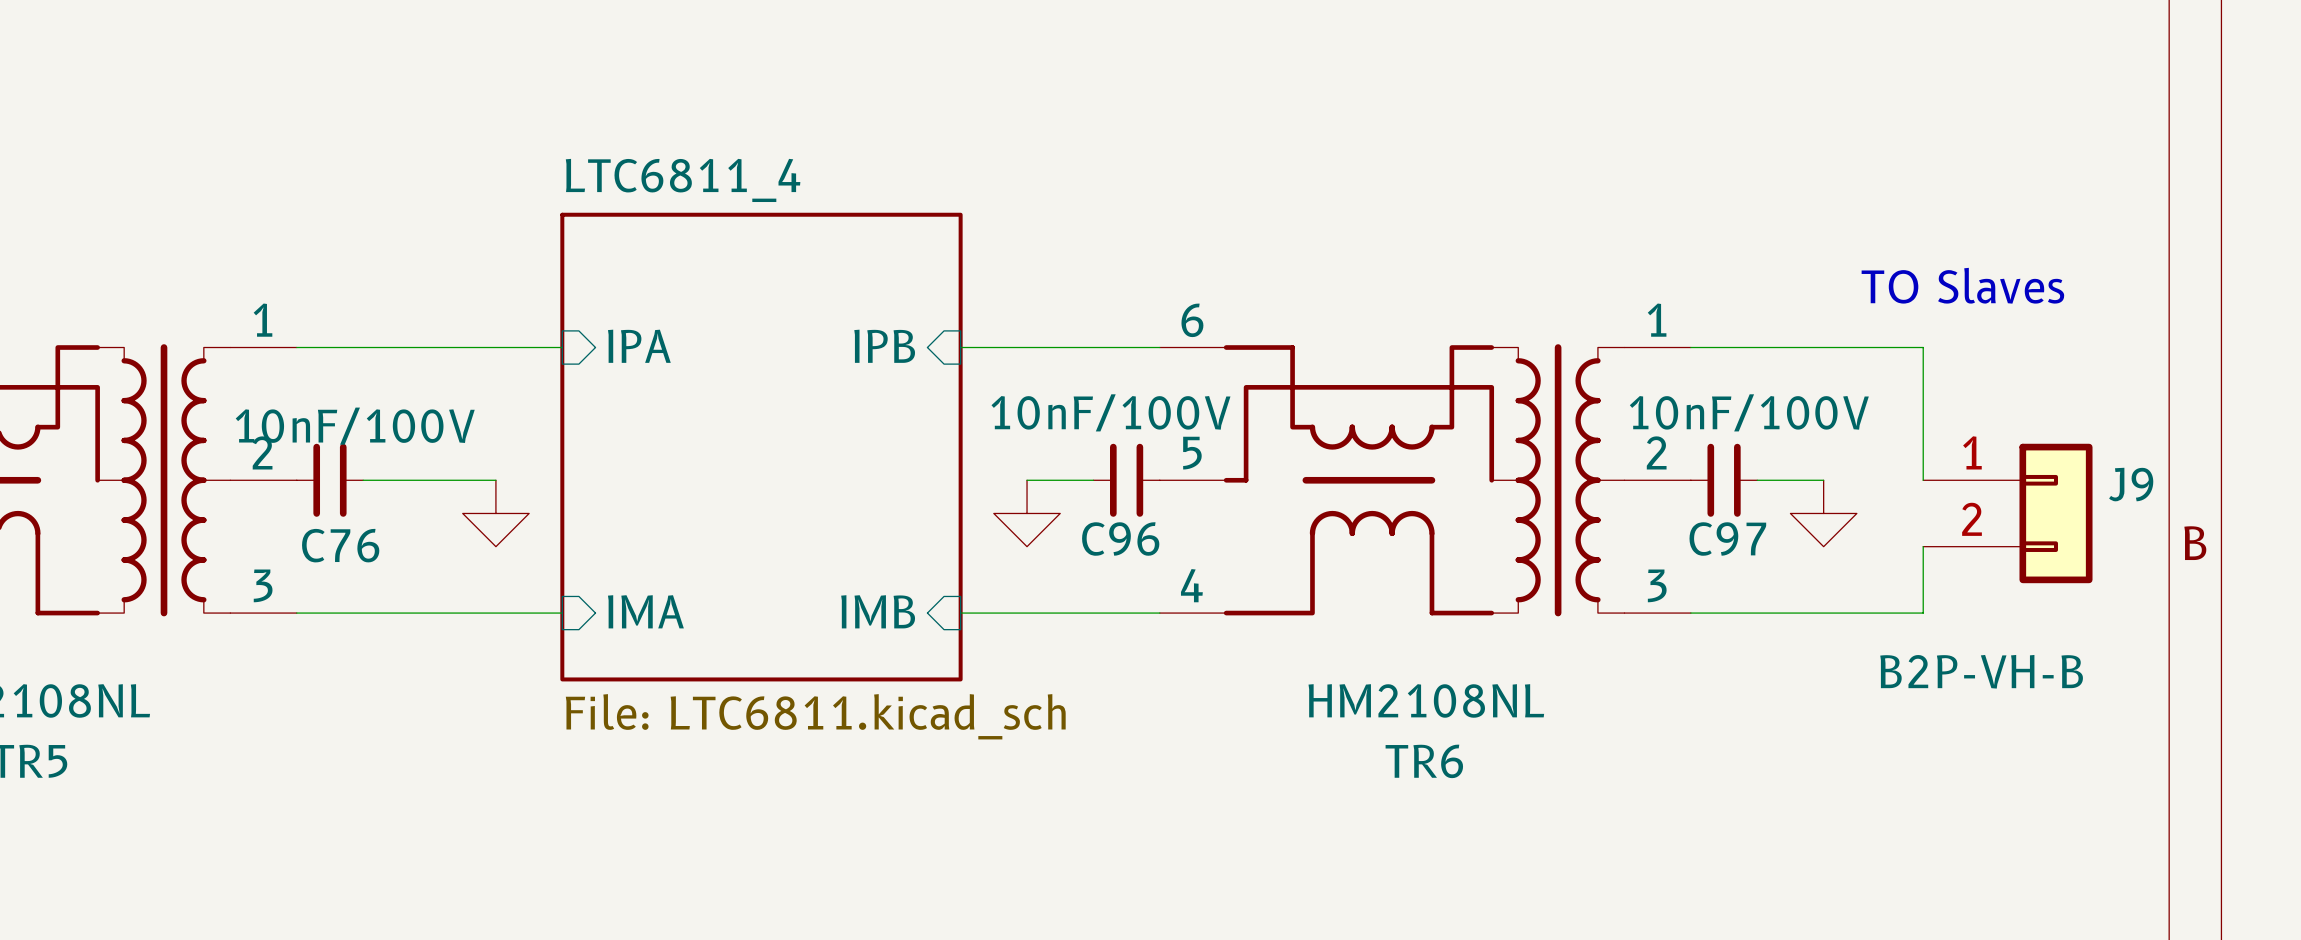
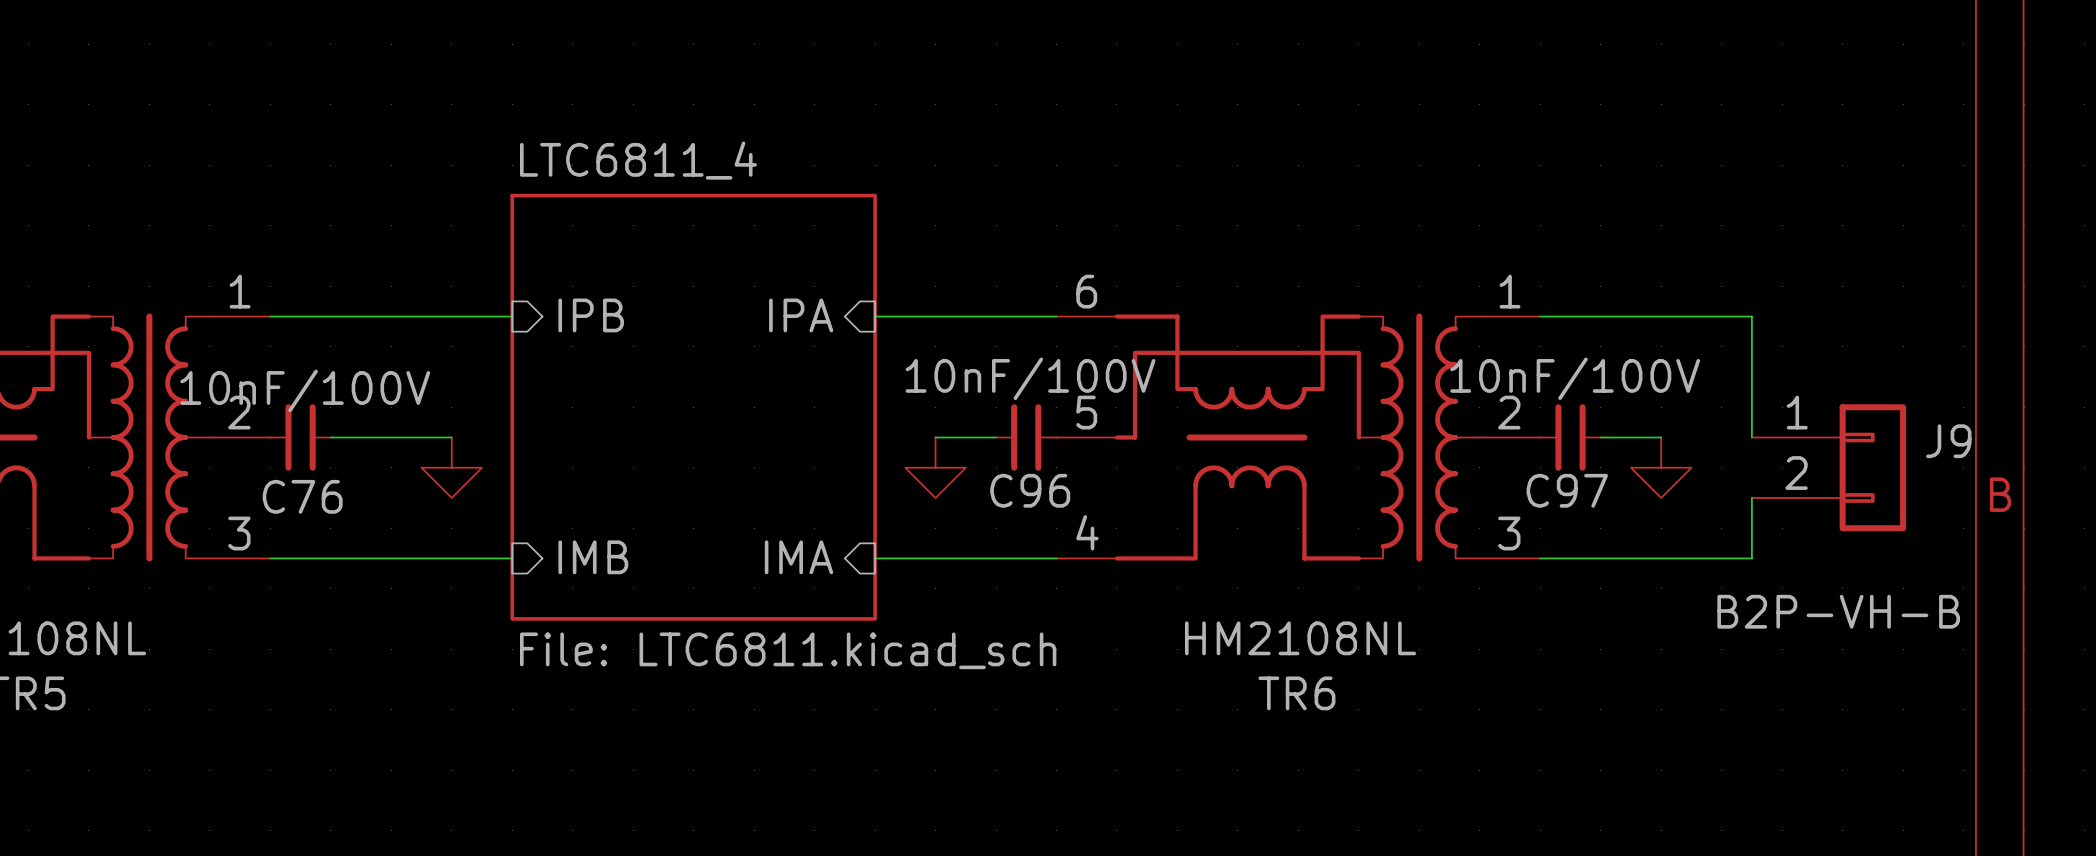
text: TO Slaves (1962, 285) -> none
sheet pin: IPA (639, 346) -> IPB (591, 315)
sheet pin: IPB (884, 346) -> IPA (801, 315)
sheet pin: IMA (645, 611) -> IMB (593, 557)
sheet pin: IMB (878, 611) -> IMA (799, 557)

